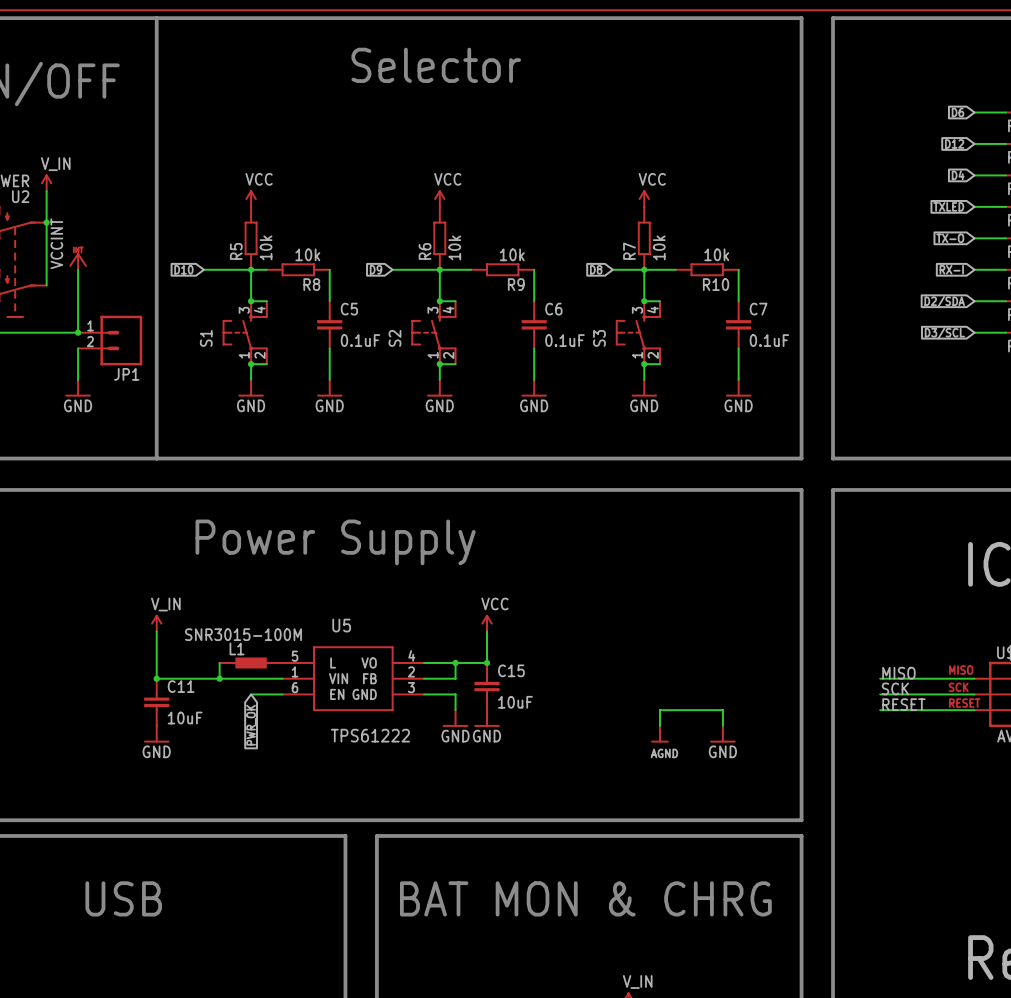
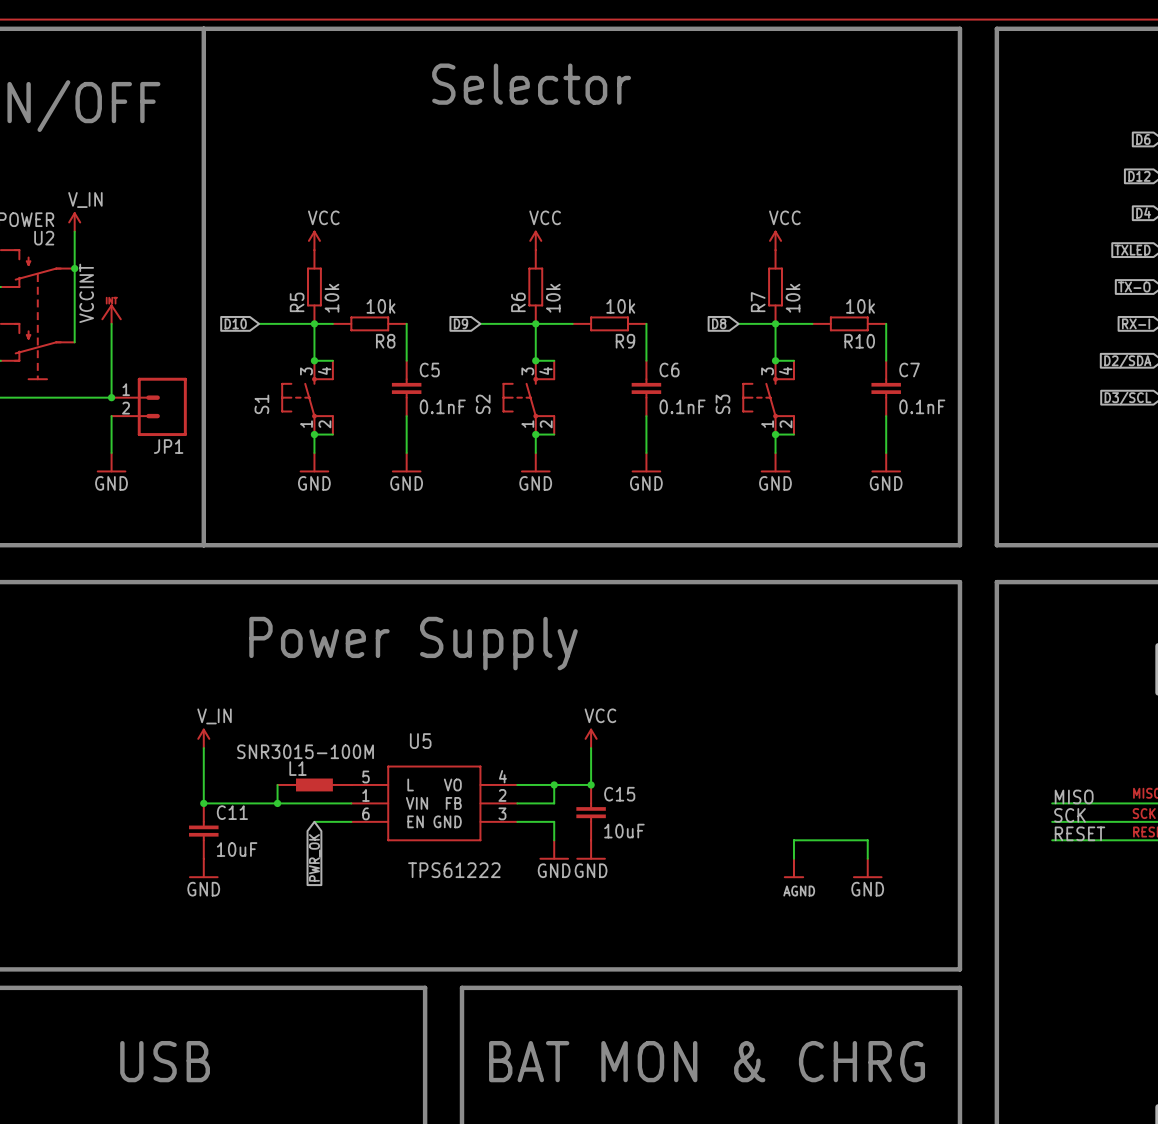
C5 value: 0.1uF (360, 340) -> 0.1nF (442, 406)
C6 value: 0.1uF (564, 340) -> 0.1nF (682, 406)
C7 value: 0.1uF (769, 340) -> 0.1nF (922, 406)

